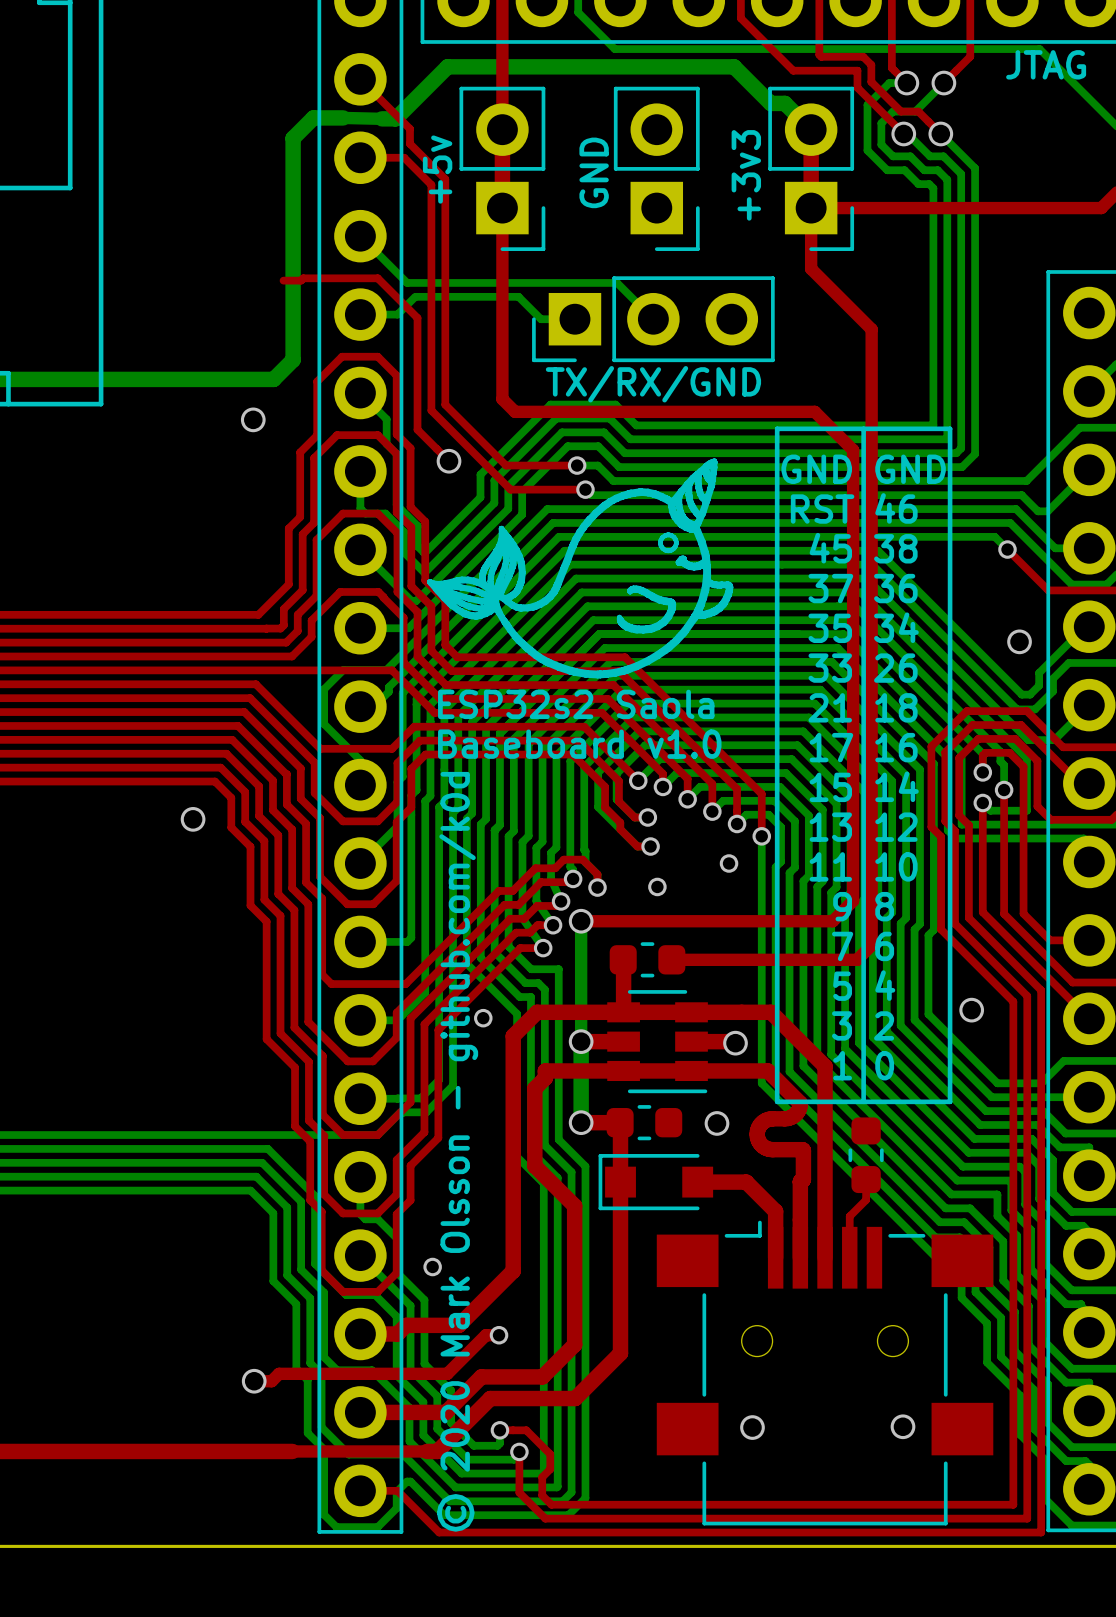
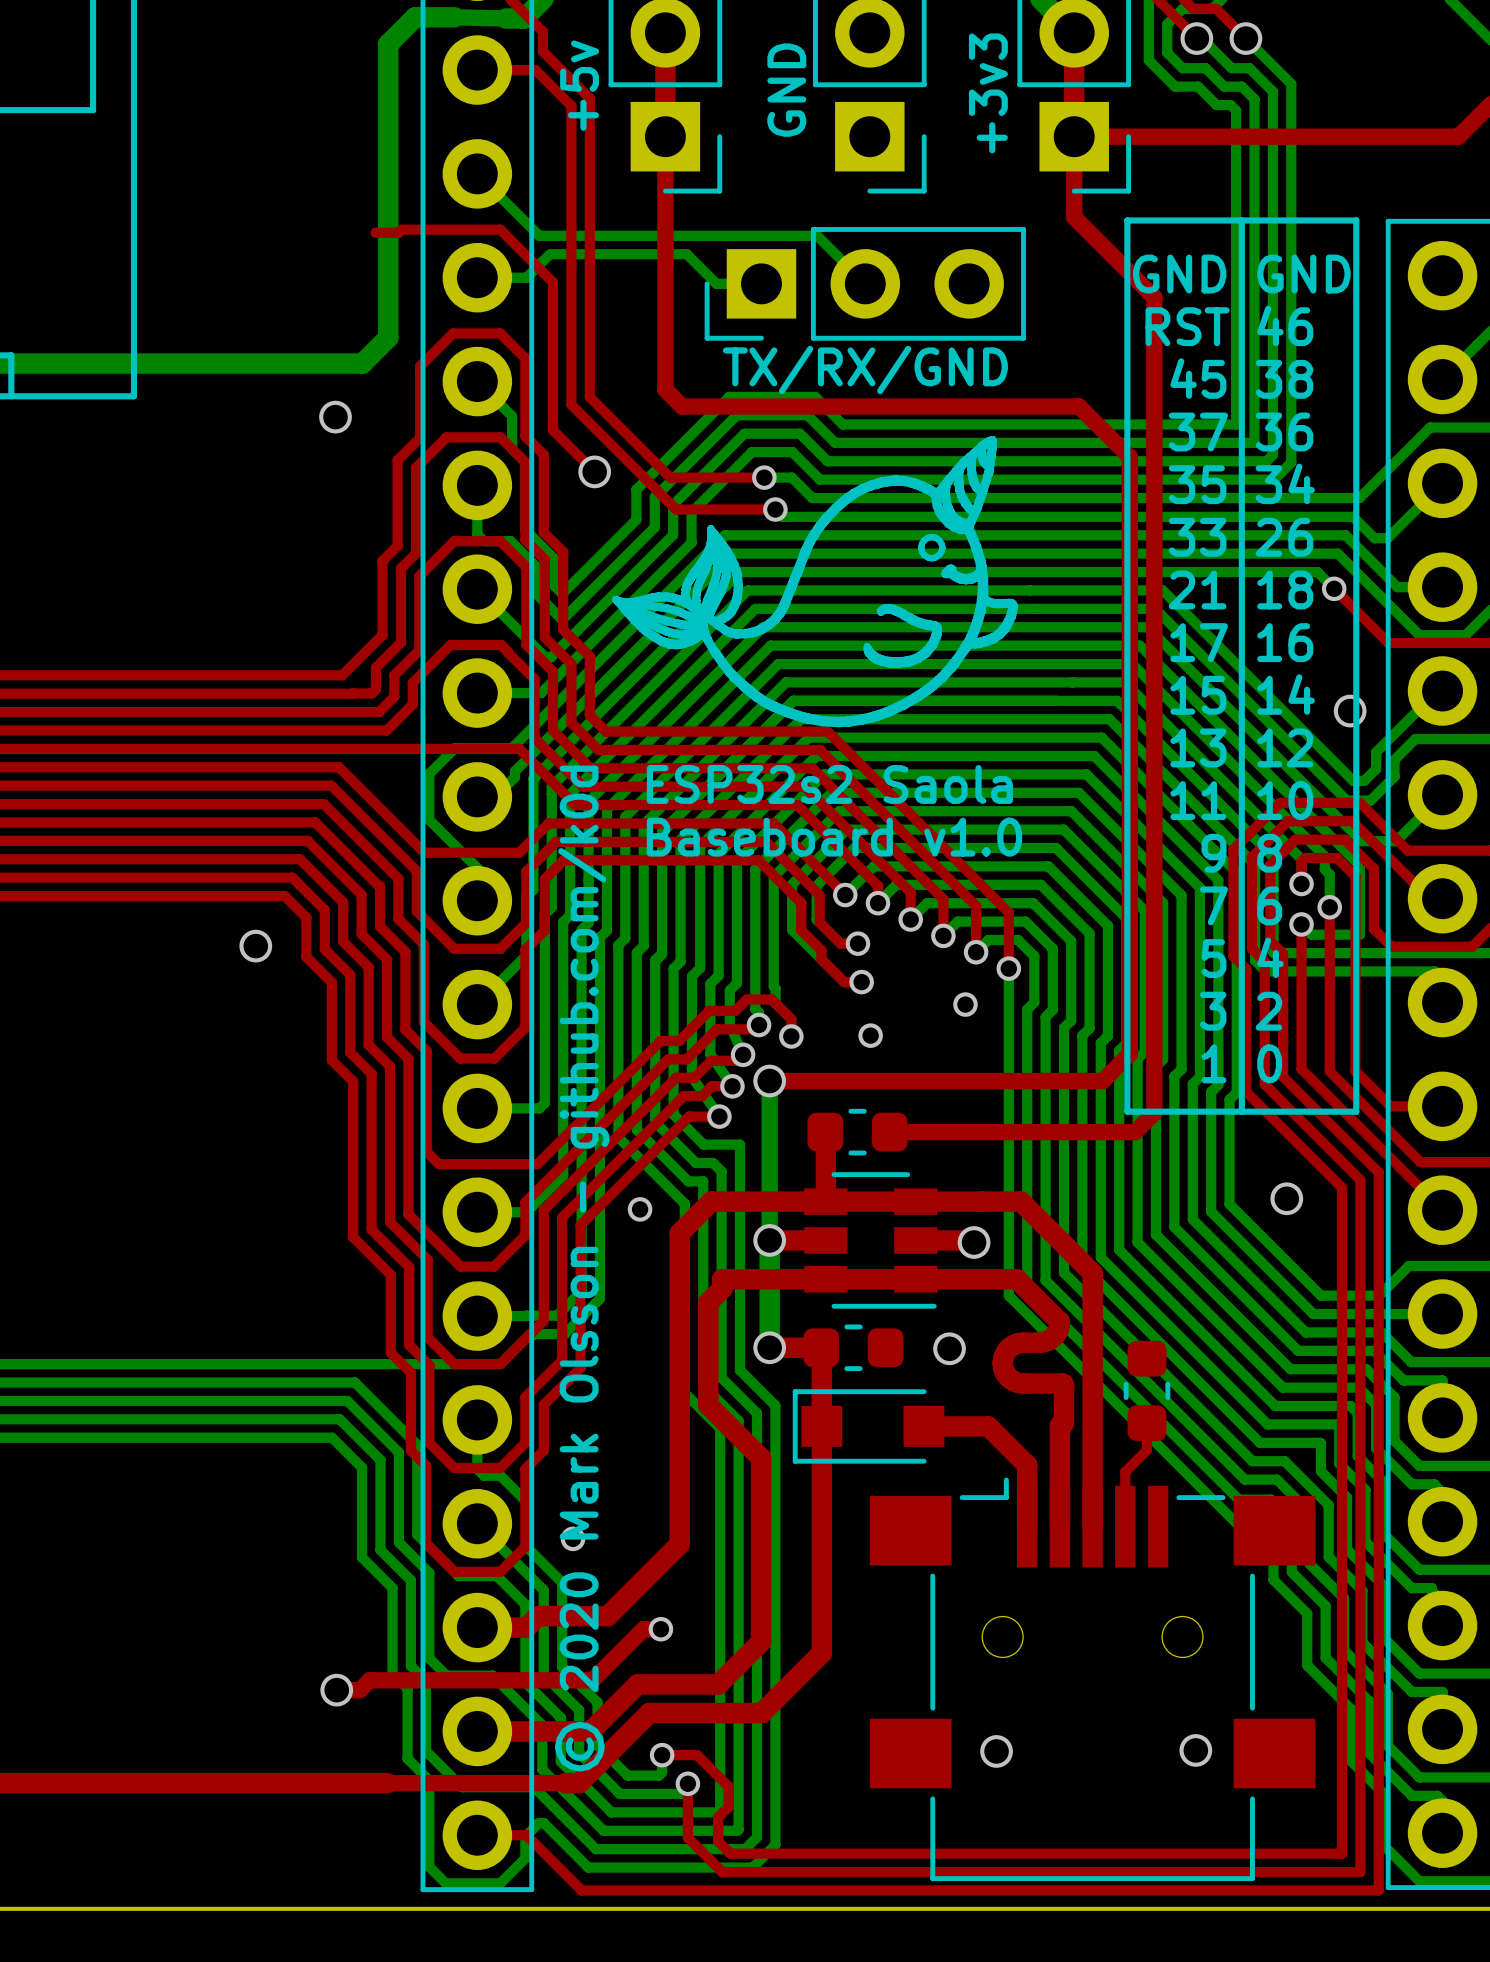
text: none -> GND (1179, 274)
text: none -> GND (1303, 274)
line: (777, 428) (950, 428) (950, 1101) (777, 1101) (777, 428) -> (1127, 220) (1356, 220) (1356, 1111) (1127, 1111) (1127, 220)
line: (863, 428) (863, 1101) -> (1241, 220) (1241, 1111)
text: GND (816, 469) -> none
text: GND (910, 469) -> none
text position: 46 (896, 508) -> 46 (1285, 325)
text position: RST (822, 509) -> RST (1187, 326)
text position: 45 (830, 548) -> 45 (1198, 378)
text position: 38 (895, 548) -> 38 (1284, 379)
drawing position: (580, 568) -> (814, 581)
text position: 37 (830, 588) -> 37 (1198, 432)
text position: 36 (895, 588) -> 36 (1284, 432)
text position: 34 (896, 627) -> 34 (1285, 483)
text position: 35 (830, 628) -> 35 (1197, 484)
text position: 33 (830, 668) -> 33 (1197, 537)
text position: 26 (895, 668) -> 26 (1284, 537)
text position: ESP32s2 Saola (576, 704) -> ESP32s2 Saola (829, 784)
text position: 21 (830, 707) -> 21 (1197, 589)
text position: 18 (896, 707) -> 18 (1285, 589)
text position: Baseboard v1.0 (579, 744) -> Baseboard v1.0 (834, 837)
text position: 17 (831, 747) -> 17 (1199, 642)
text position: 16 (896, 747) -> 16 (1285, 642)
text position: 14 (897, 786) -> 14 (1286, 694)
text position: 15 (830, 787) -> 15 (1198, 695)
text position: 13 (830, 827) -> 13 (1198, 747)
text position: 12 (896, 827) -> 12 (1285, 747)
text position: 11 (830, 866) -> 11 (1198, 800)
text position: 10 (896, 866) -> 10 (1285, 800)
text position: 9 (842, 906) -> 9 (1213, 853)
text position: 8 (884, 906) -> 8 (1269, 853)
text position: 7 (842, 946) -> 7 (1213, 905)
text position: 6 (884, 946) -> 6 (1269, 905)
text position: 4 (885, 985) -> 4 (1270, 957)
text position: 5 (842, 986) -> 5 (1213, 958)
text position: 3 (842, 1025) -> 3 (1213, 1011)
text position: 2 (884, 1025) -> 2 (1268, 1011)
text position: 1 (842, 1065) -> 1 (1213, 1063)
text position: 0 (884, 1065) -> 0 (1269, 1063)
text position: © 2020 Mark Olsson - github.com/k0d (457, 1151) -> © 2020 Mark Olsson - github.com/k0d (582, 1268)

